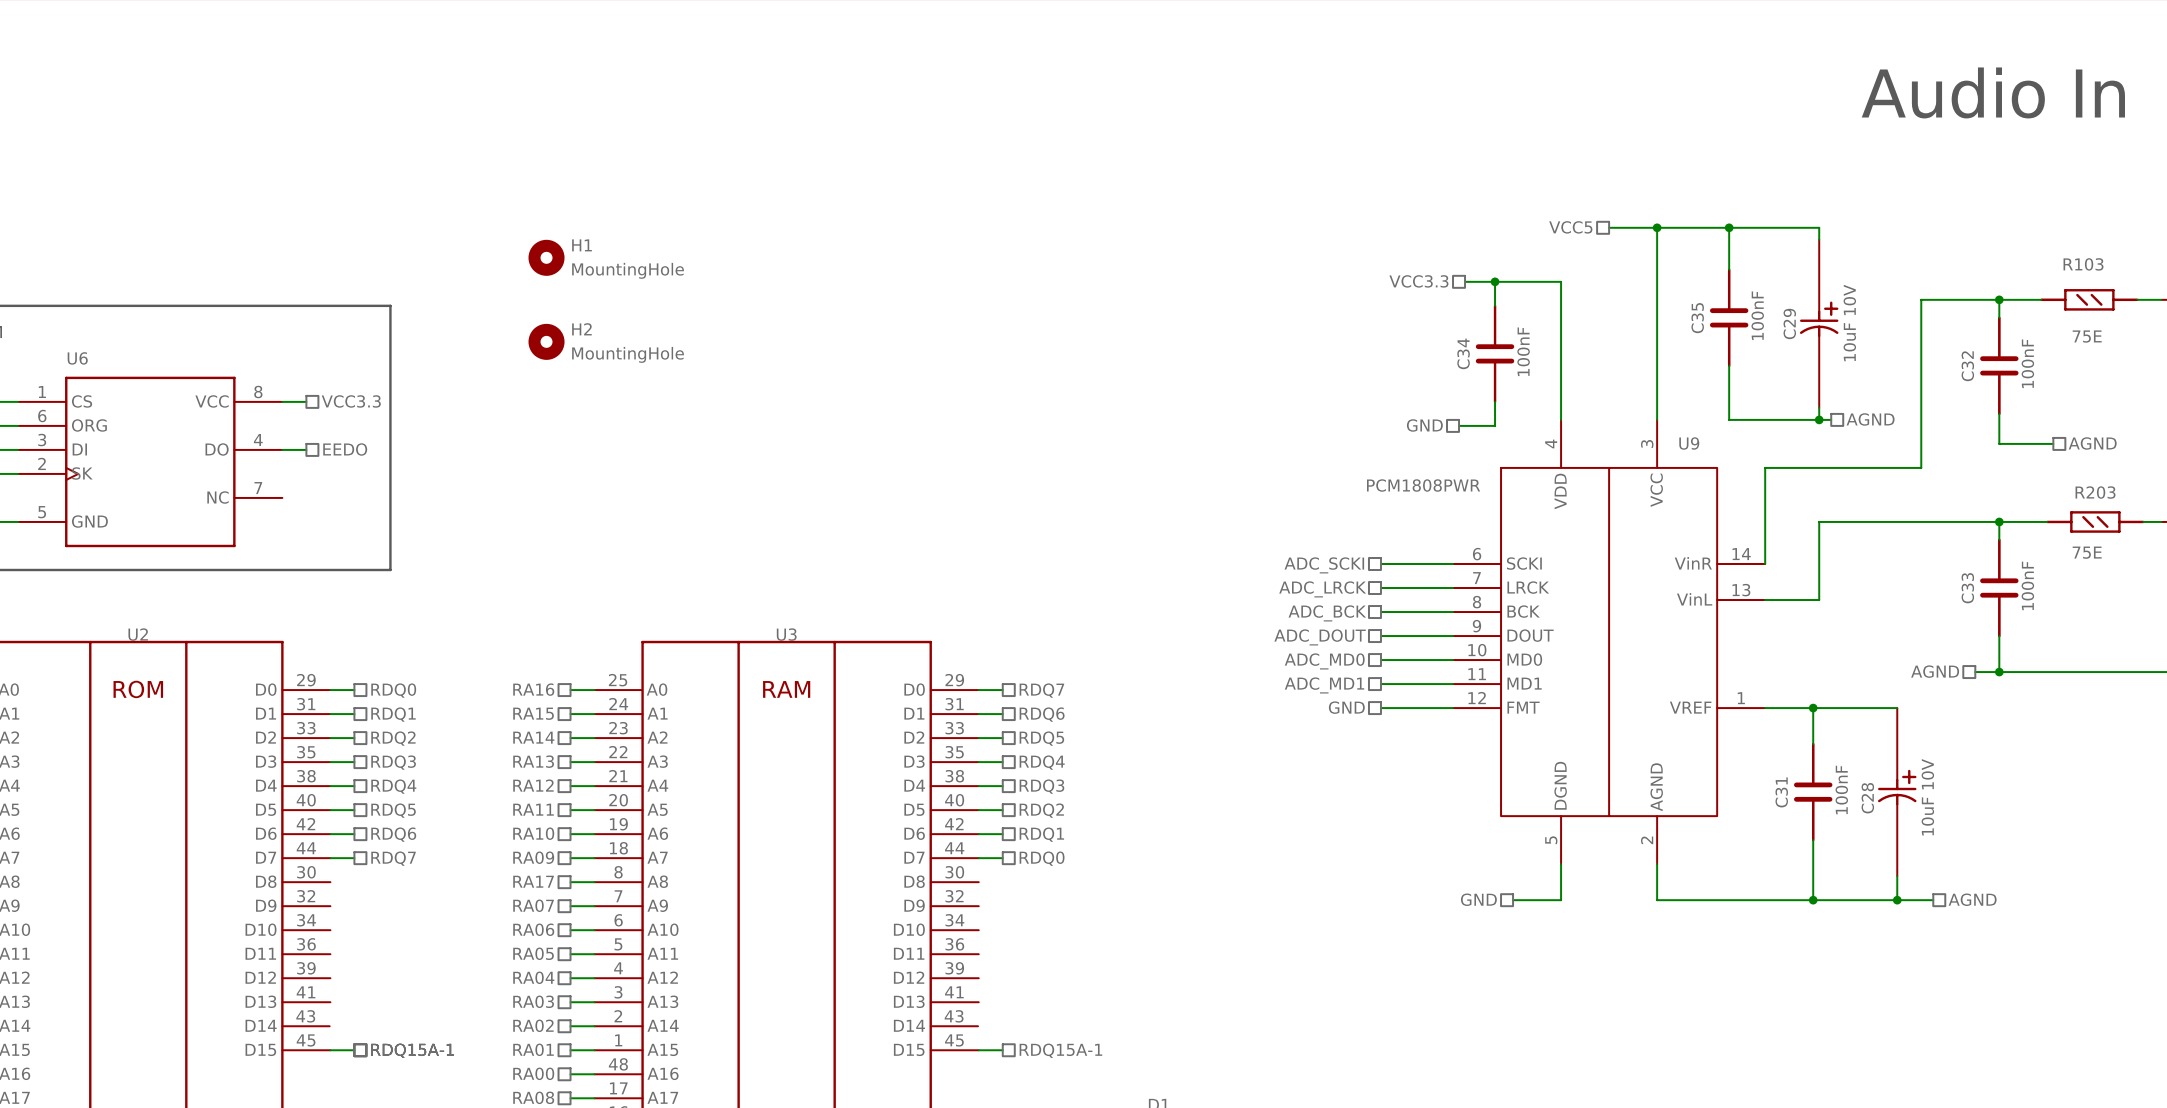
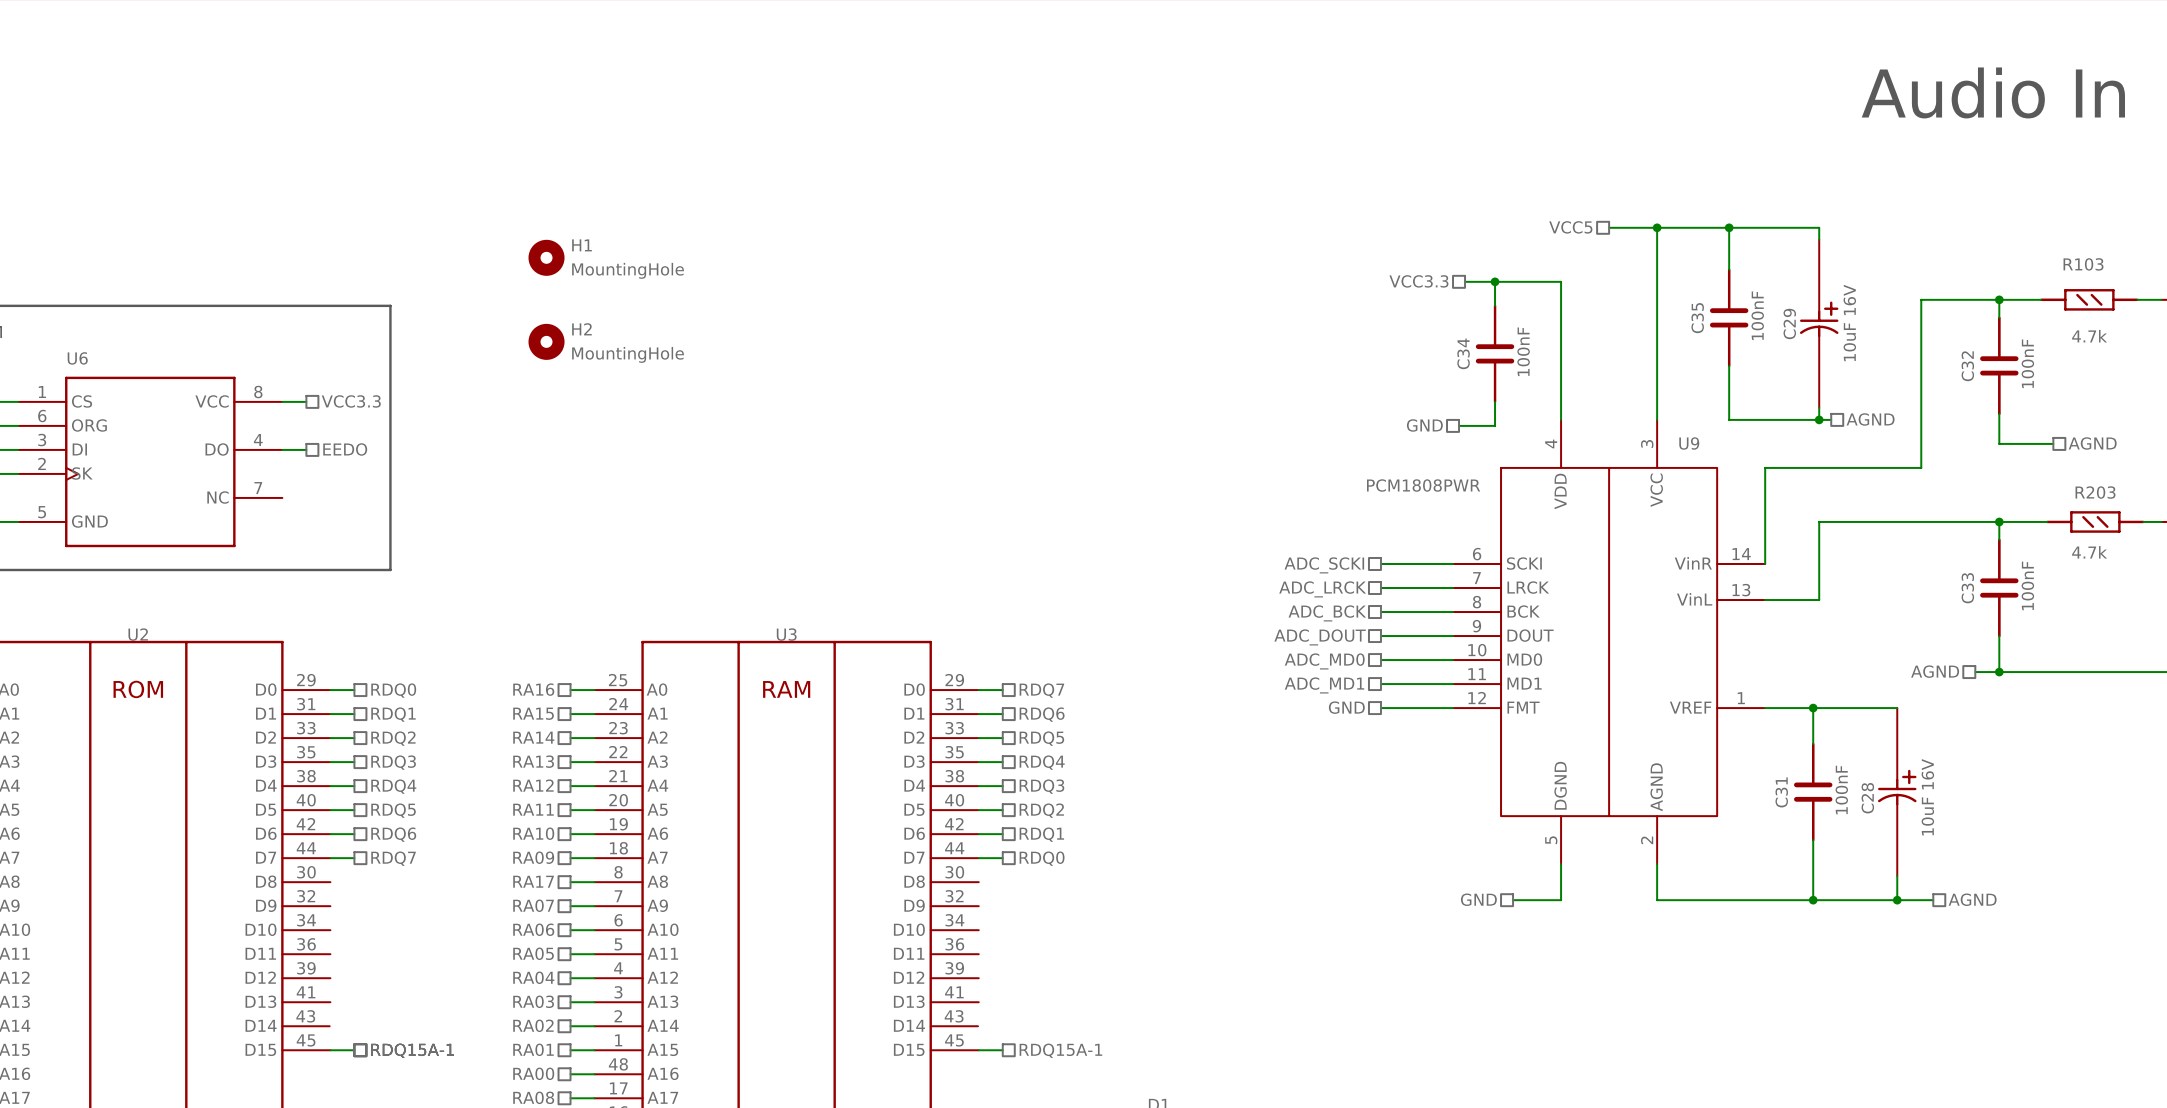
C29 value: 10uF 10V (1849, 323) -> 10uF 16V (1849, 323)
R103 value: 75E (2087, 336) -> 4.7k (2089, 336)
R203 value: 75E (2087, 552) -> 4.7k (2089, 552)
C28 value: 10uF 10V (1927, 797) -> 10uF 16V (1927, 797)

